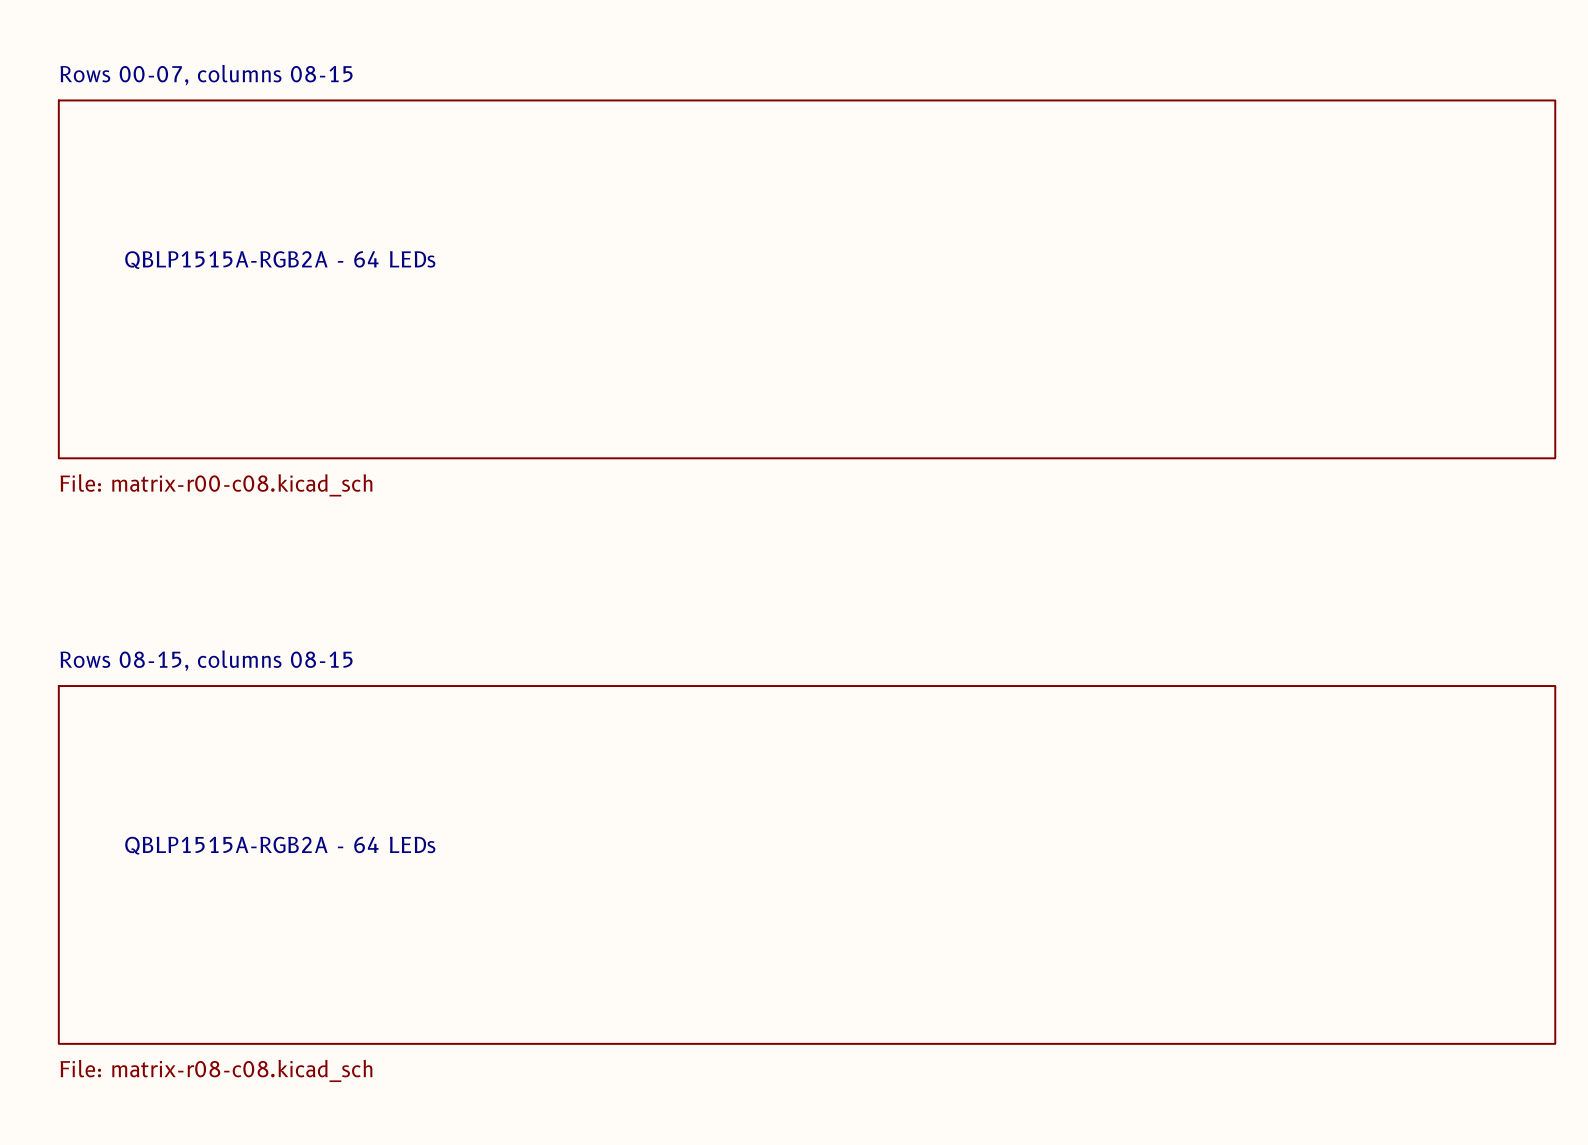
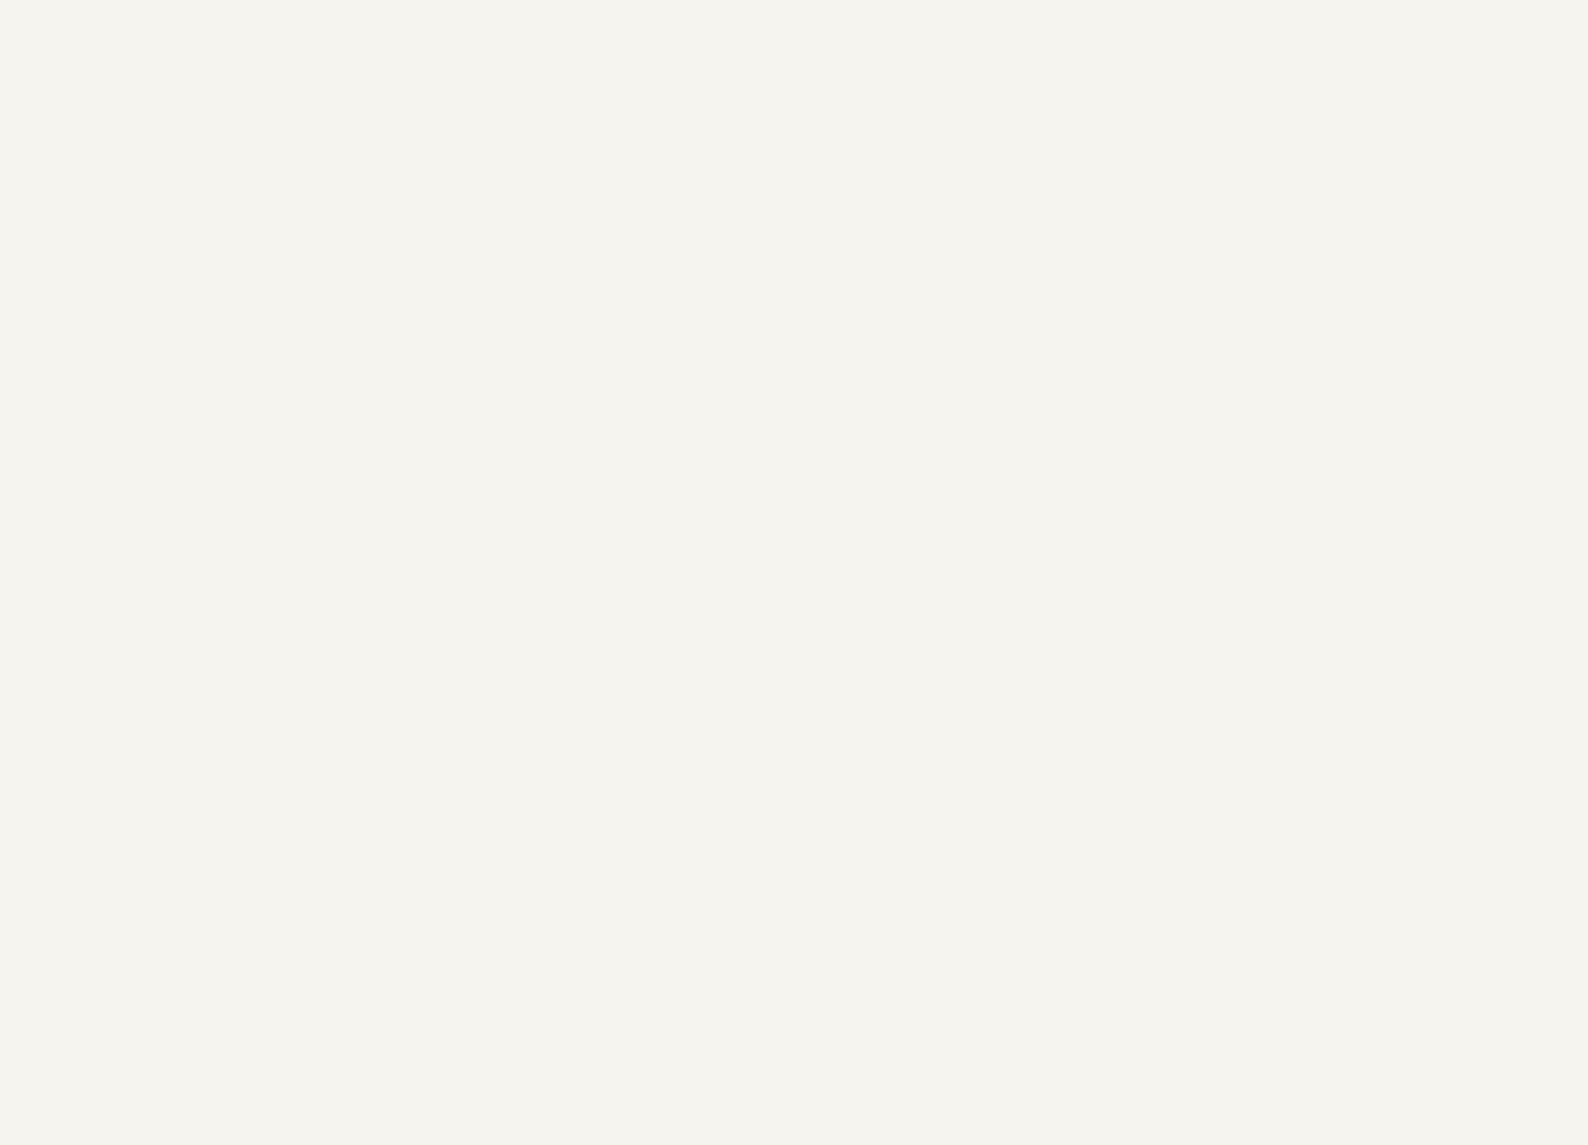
text: QBLP1515A-RGB2A - 64 LEDs (280, 260) -> none
sheet Rows 00-07, columns 08-15: File: matrix-r00-c08.kicad_sch (807, 279) -> none
text: QBLP1515A-RGB2A - 64 LEDs (280, 845) -> none
sheet Rows 08-15, columns 08-15: File: matrix-r08-c08.kicad_sch (807, 864) -> none

